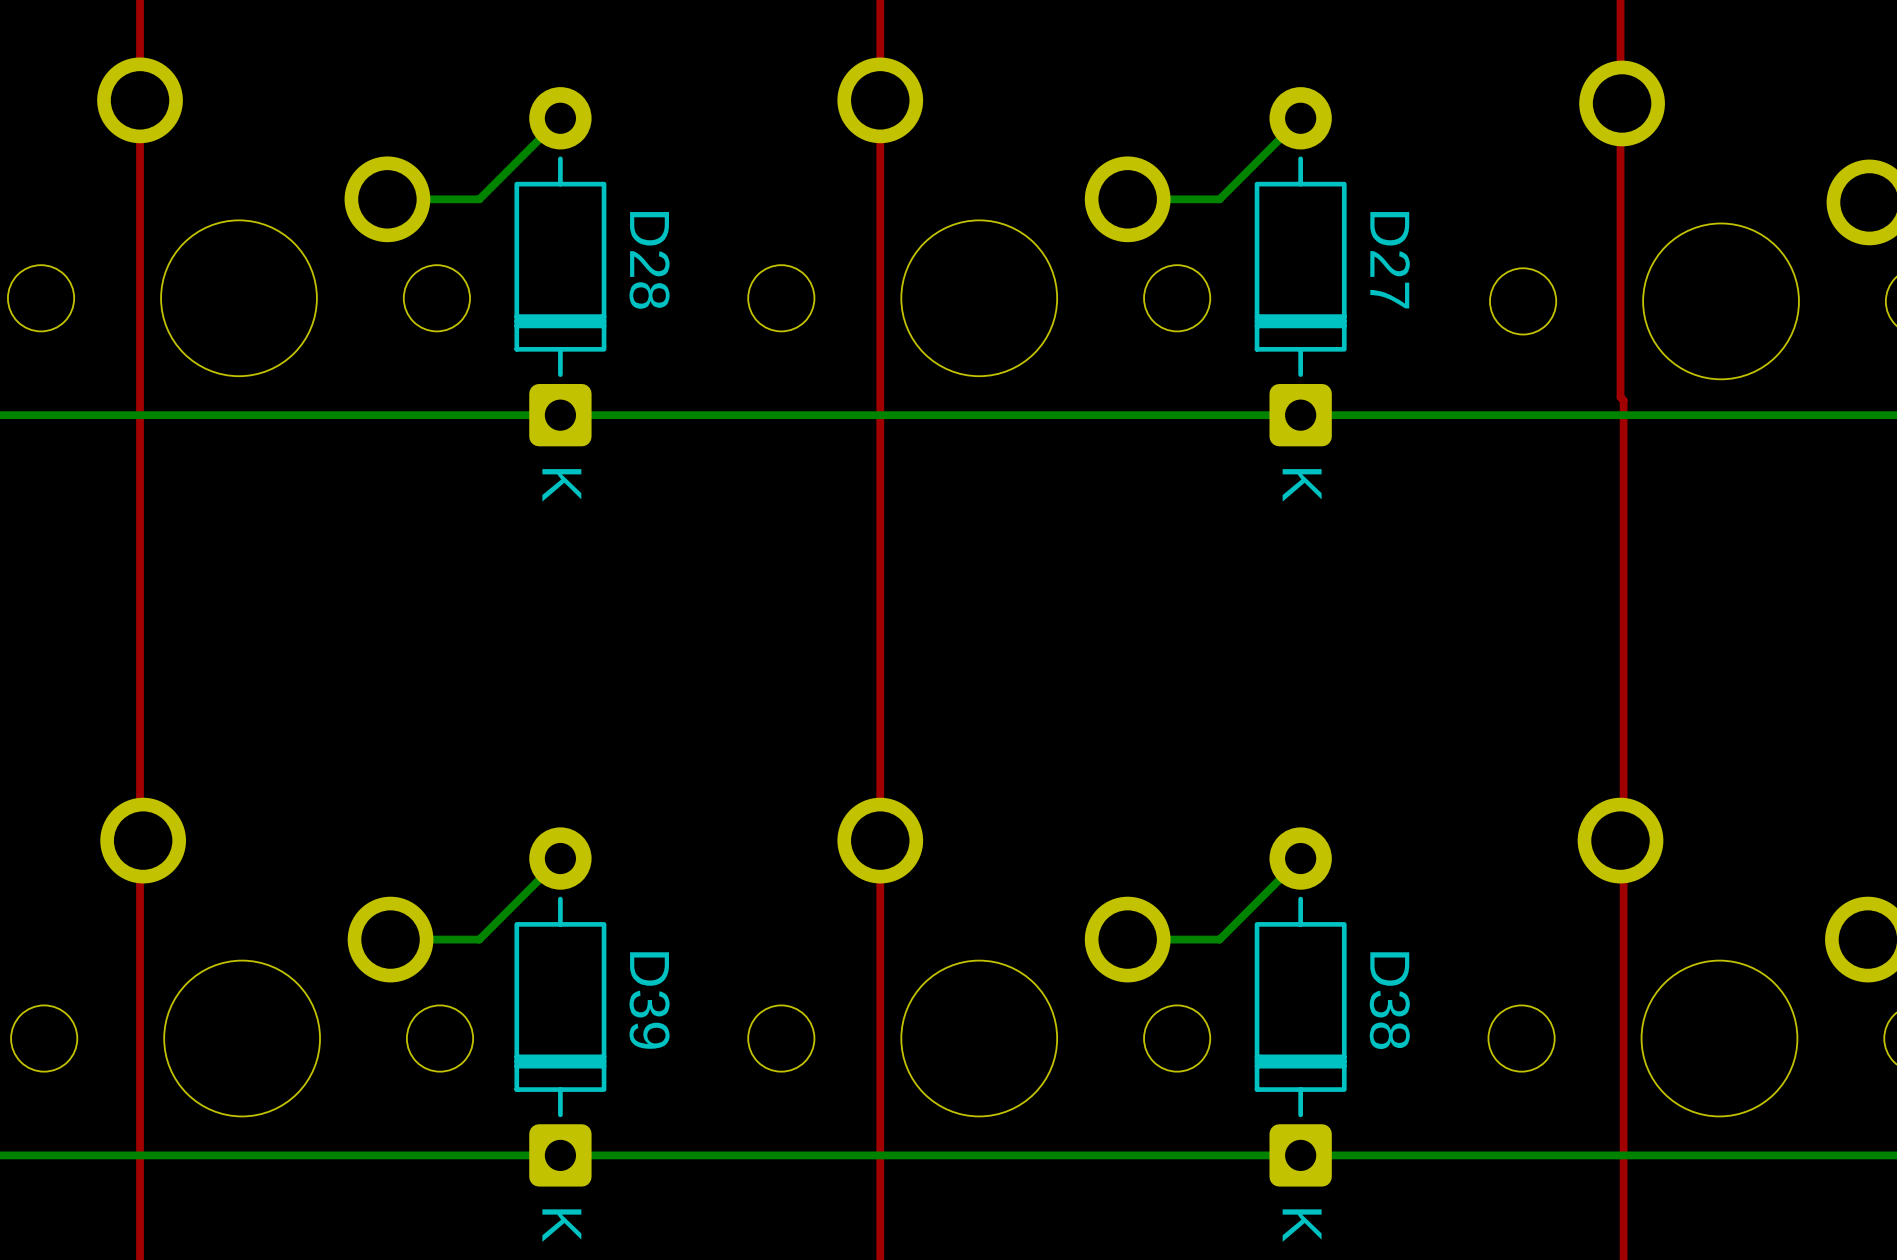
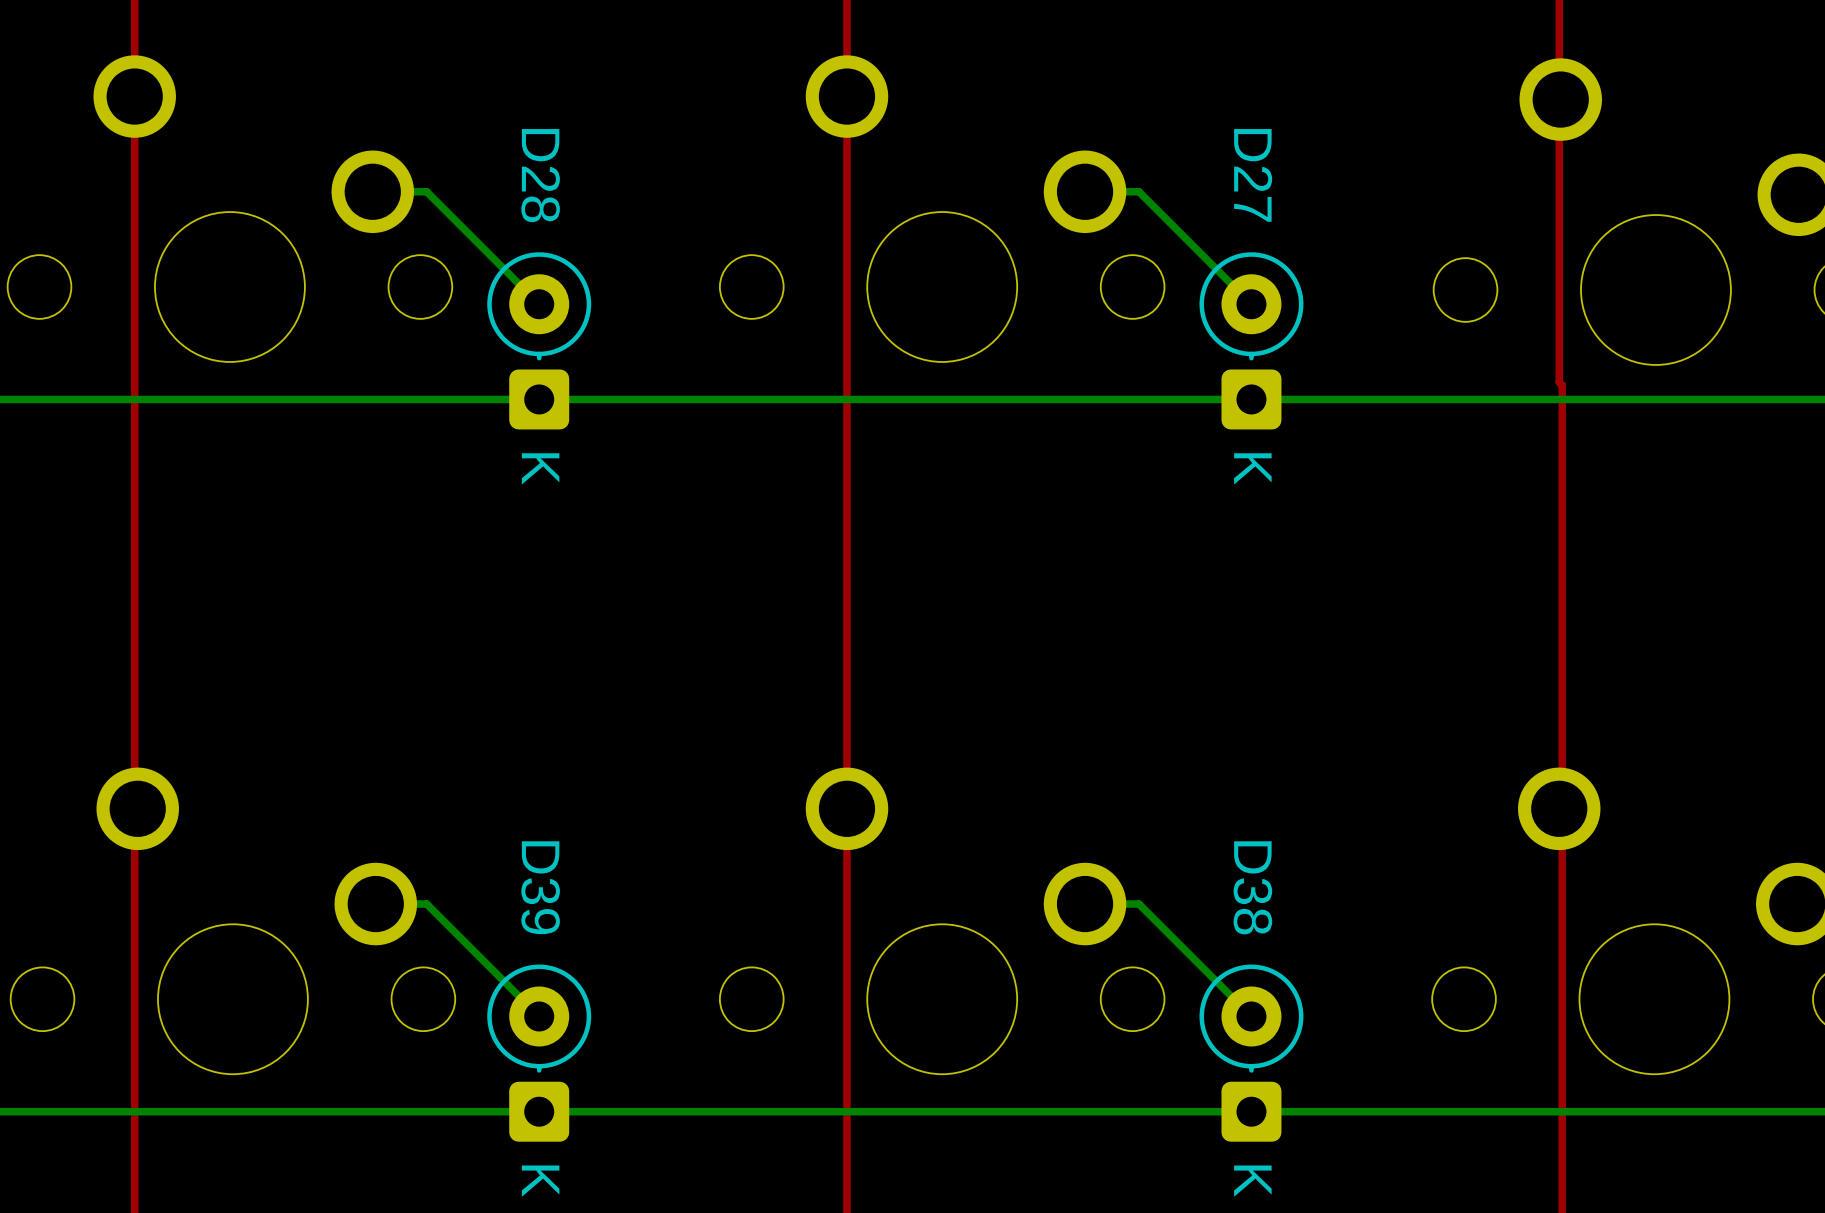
D28 footprint: [514, 87, 607, 447] -> [487, 252, 592, 430]
D27 footprint: [1254, 87, 1347, 447] -> [1199, 252, 1304, 430]
bottom track: (560, 118) (479, 199) (443, 199) -> (539, 304) (426, 191)
bottom track: (1300, 118) (1219, 199) (1183, 199) -> (1251, 304) (1139, 191)
D28 name position: D28 (649, 260) -> D28 (540, 175)
D27 name position: D27 (1390, 260) -> D27 (1253, 175)
D39 footprint: [514, 827, 607, 1187] -> [487, 964, 592, 1142]
D38 footprint: [1254, 827, 1347, 1187] -> [1199, 964, 1304, 1142]
bottom track: (560, 858) (479, 939) (443, 939) -> (539, 1016) (426, 904)
bottom track: (1300, 858) (1219, 939) (1183, 939) -> (1251, 1016) (1139, 904)
D39 name position: D39 (649, 1000) -> D39 (540, 887)
D38 name position: D38 (1389, 1000) -> D38 (1252, 887)

